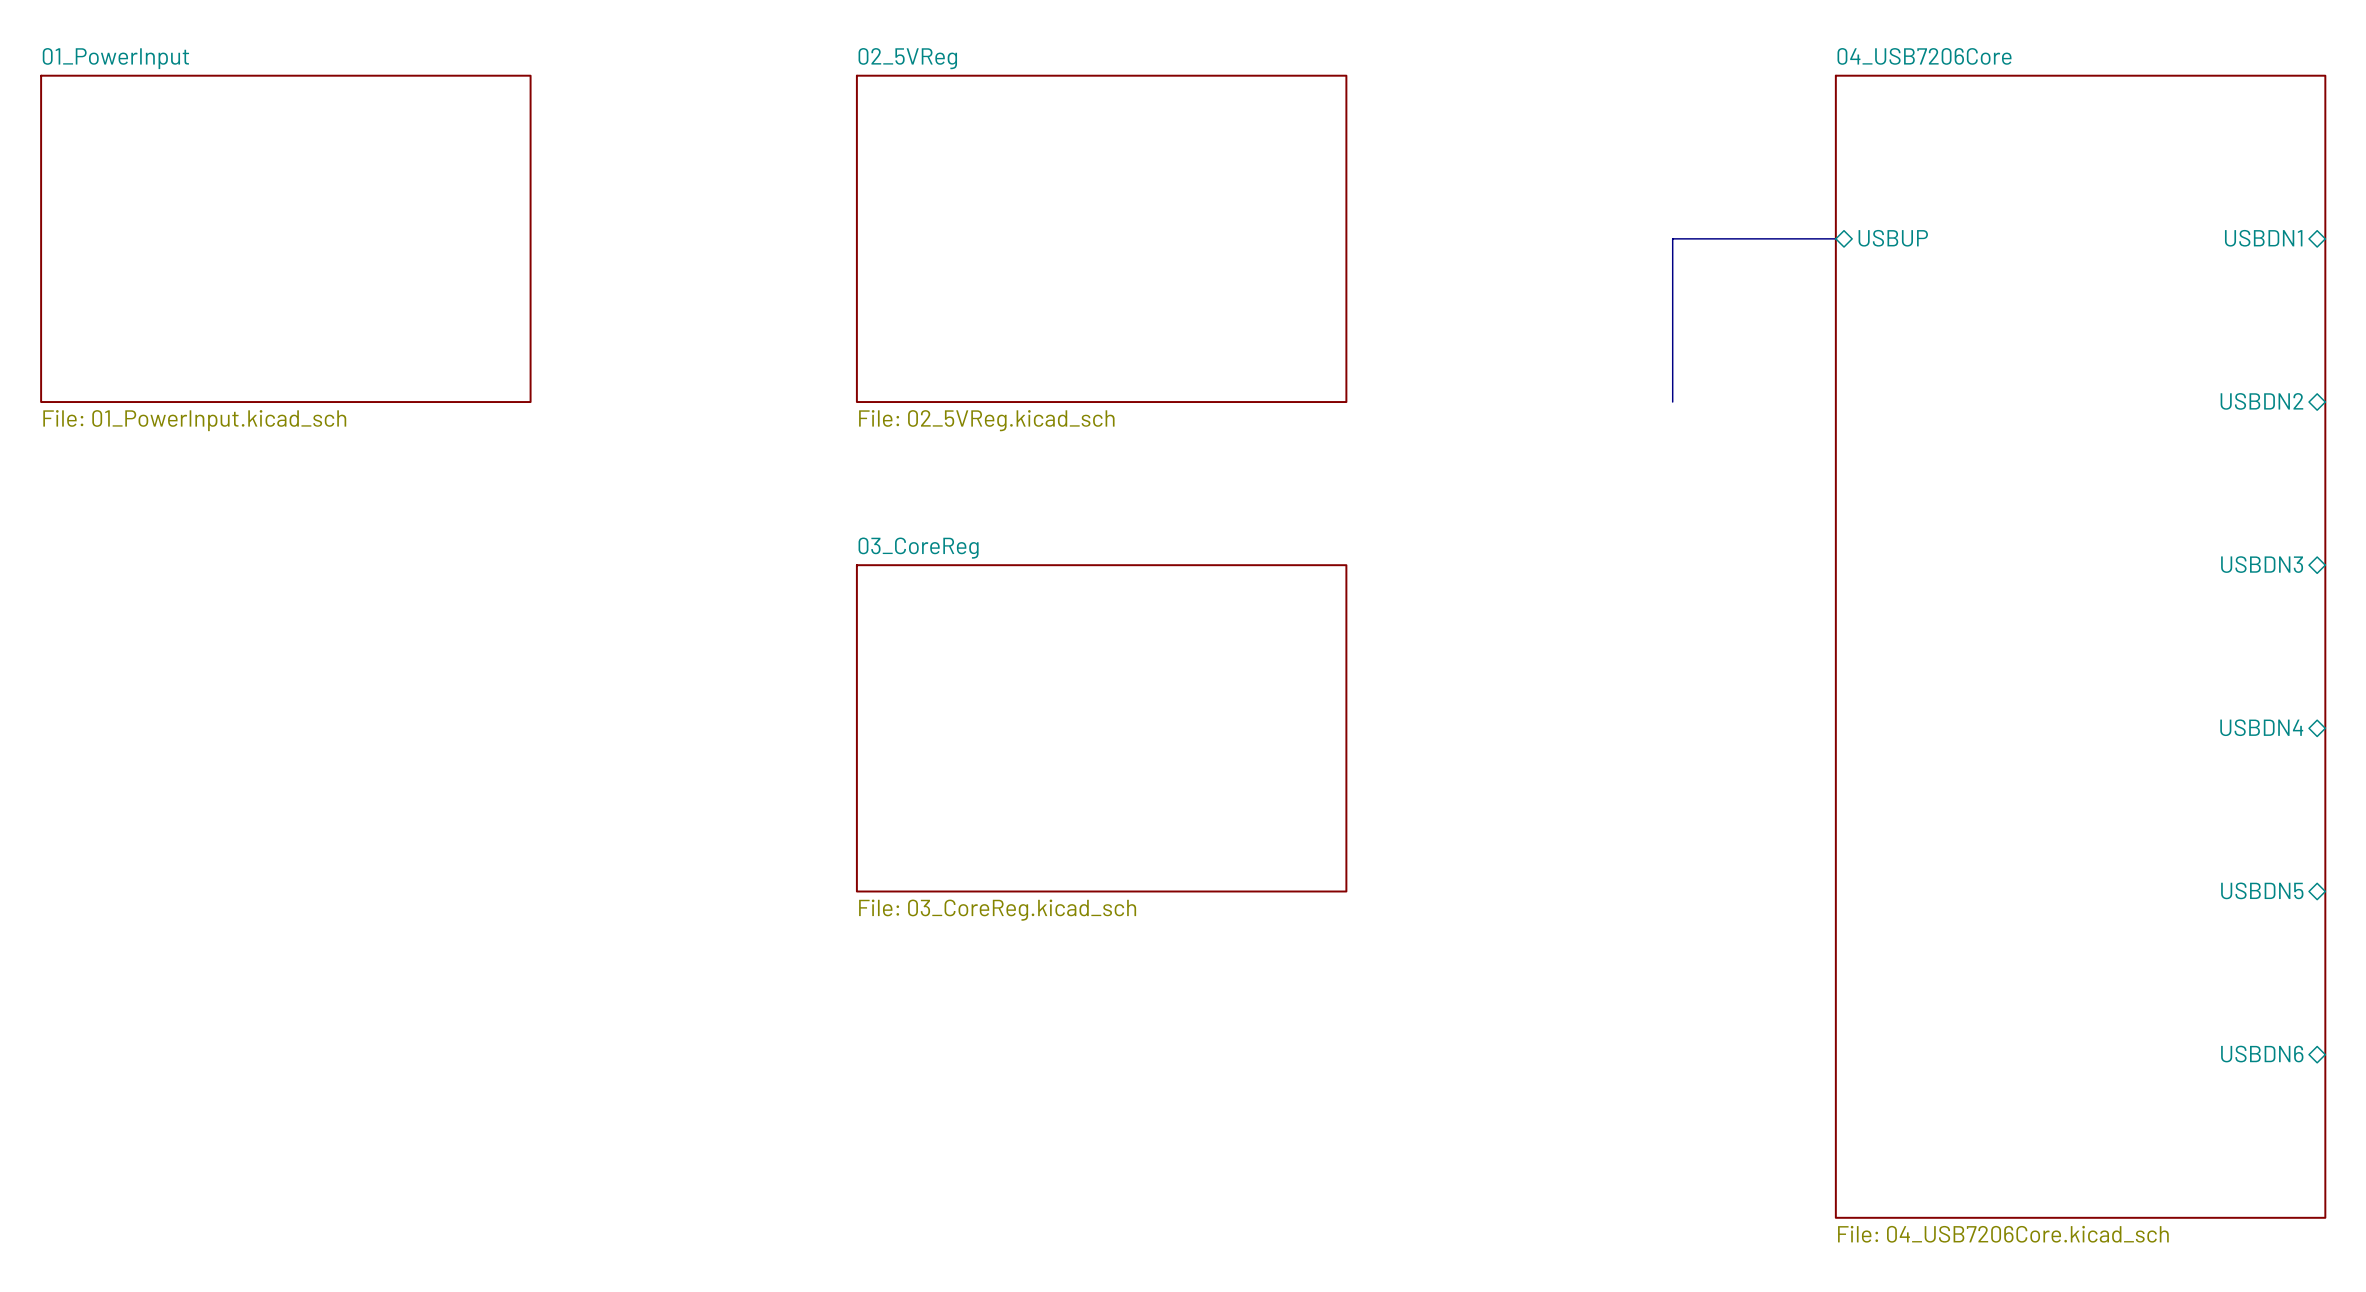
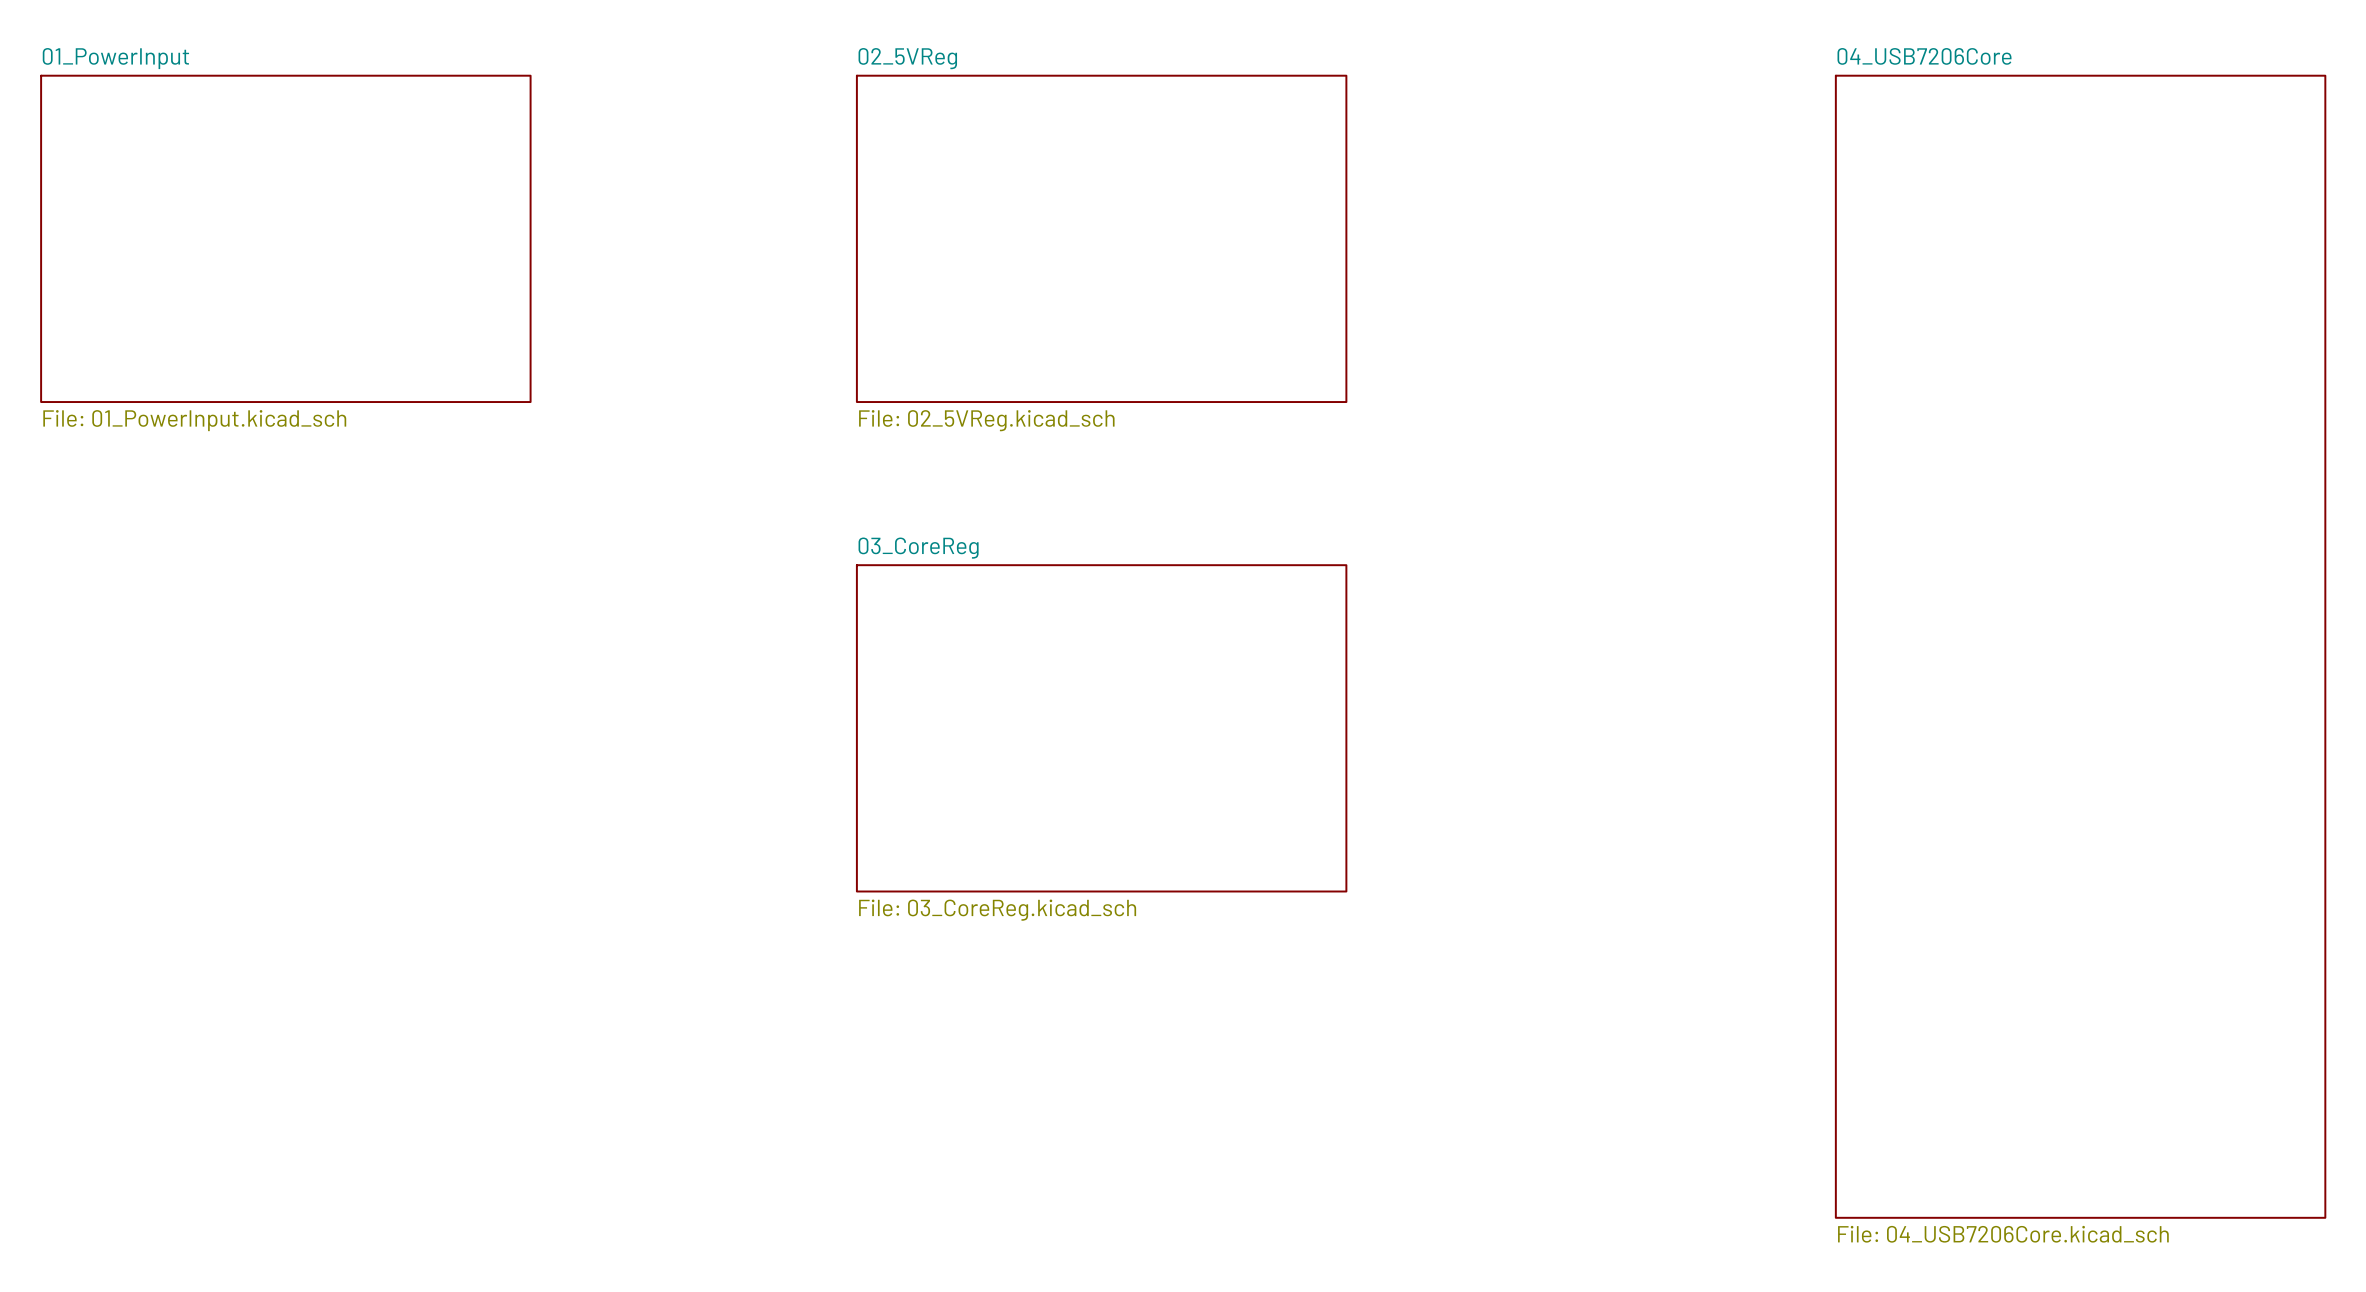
bus: (1835, 238) (1672, 238) (1672, 402) -> none
sheet pin: USBUP (1893, 238) -> none
sheet pin: USBDN1 (2263, 238) -> none
sheet pin: USBDN2 (2261, 401) -> none
sheet pin: USBDN3 (2262, 564) -> none
sheet pin: USBDN4 (2261, 727) -> none
sheet pin: USBDN5 (2262, 890) -> none
sheet pin: USBDN6 (2262, 1054) -> none

